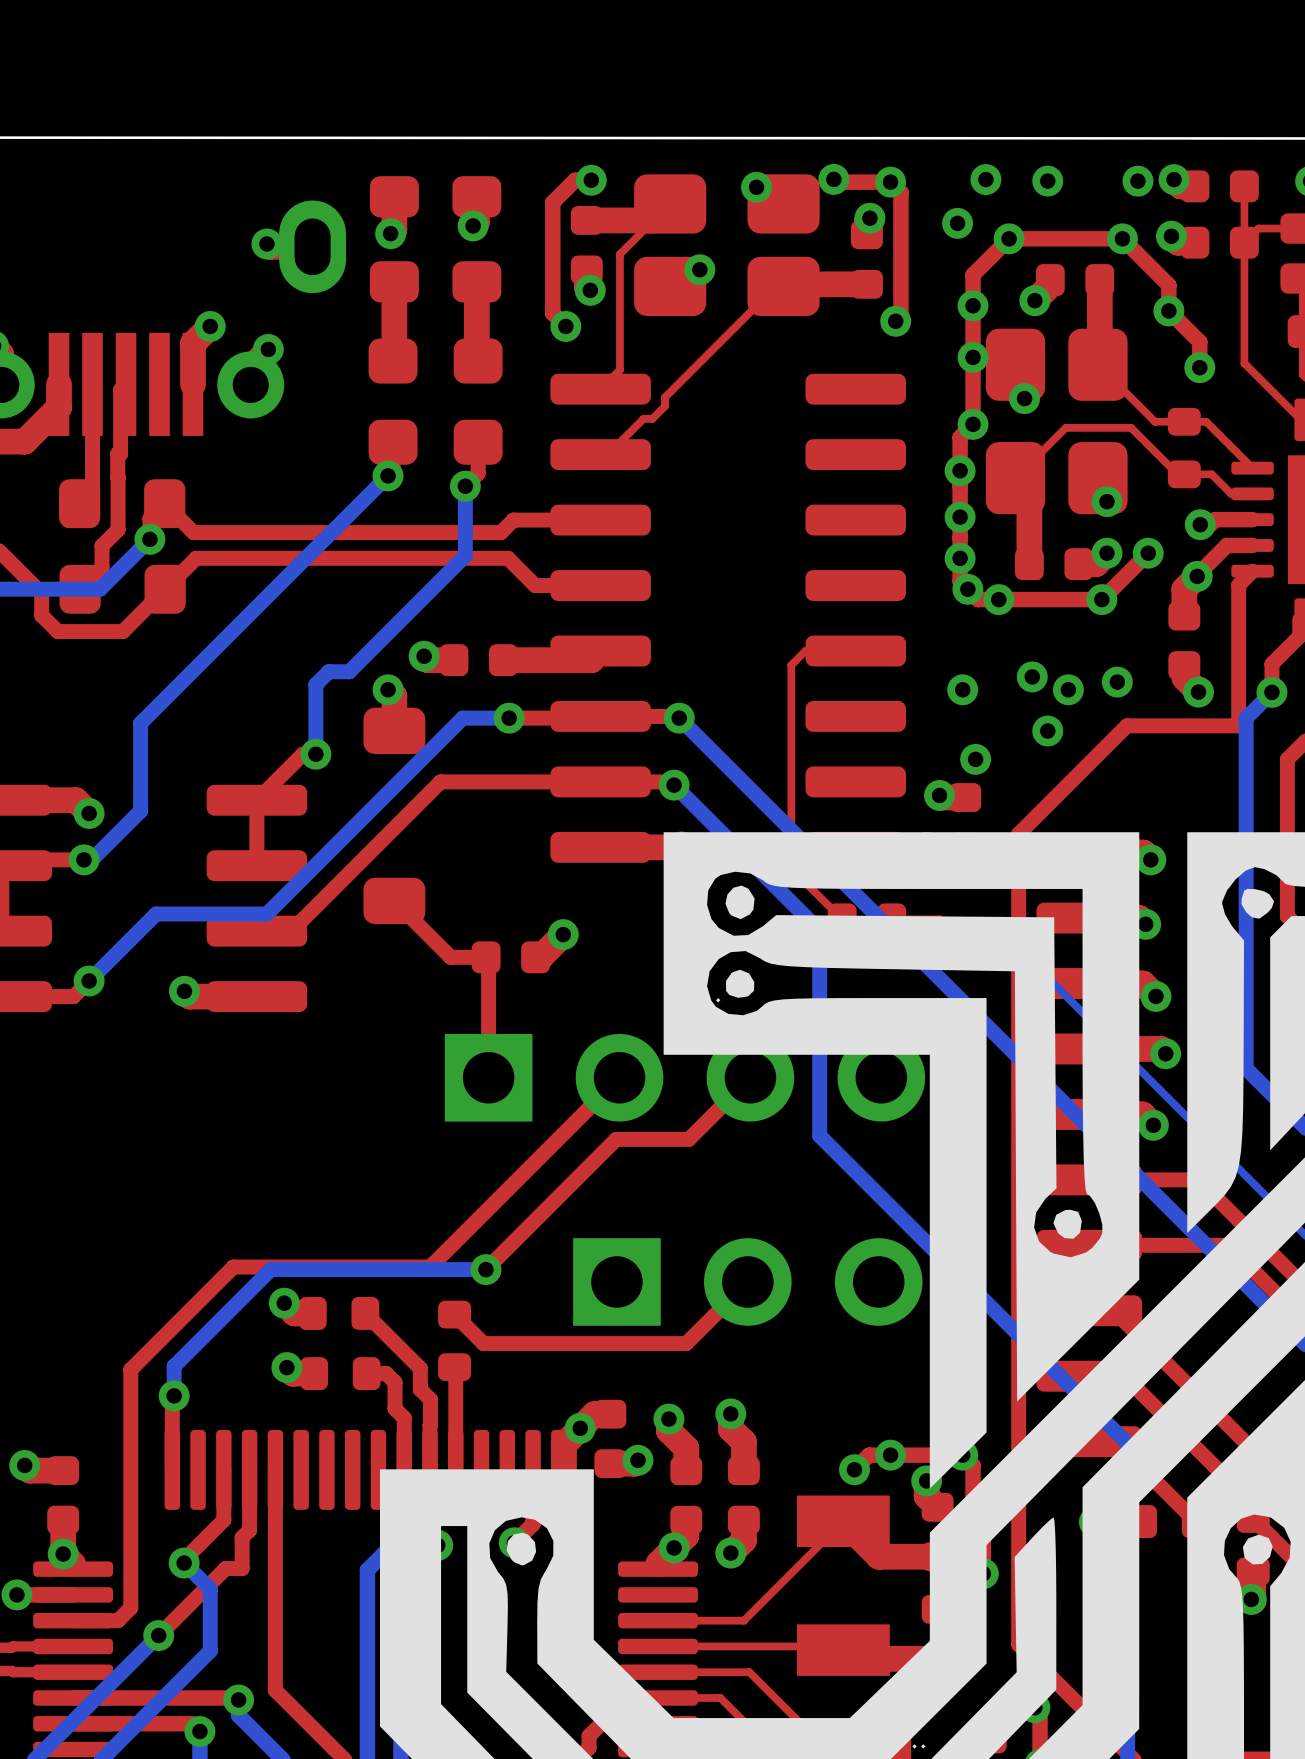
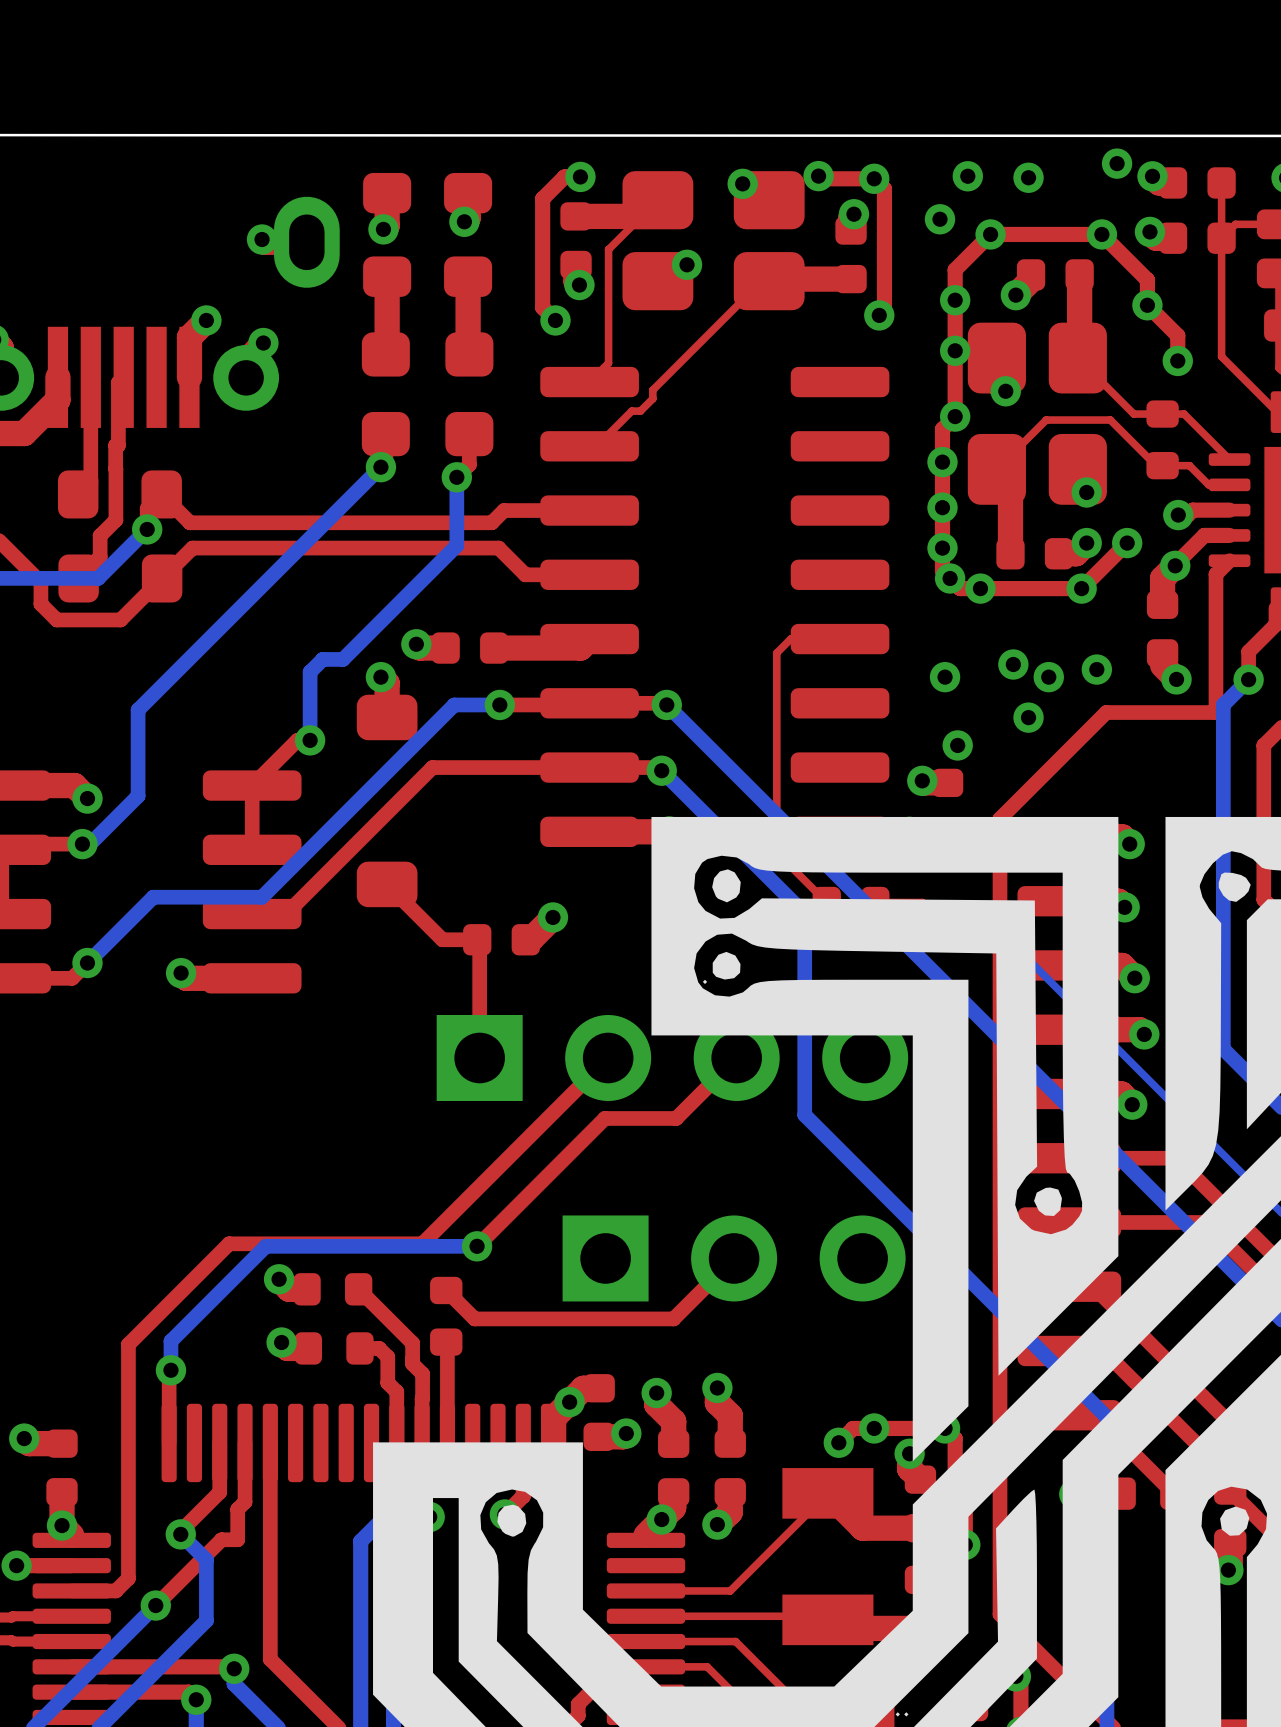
via position: (1137, 181) -> (1117, 163)

